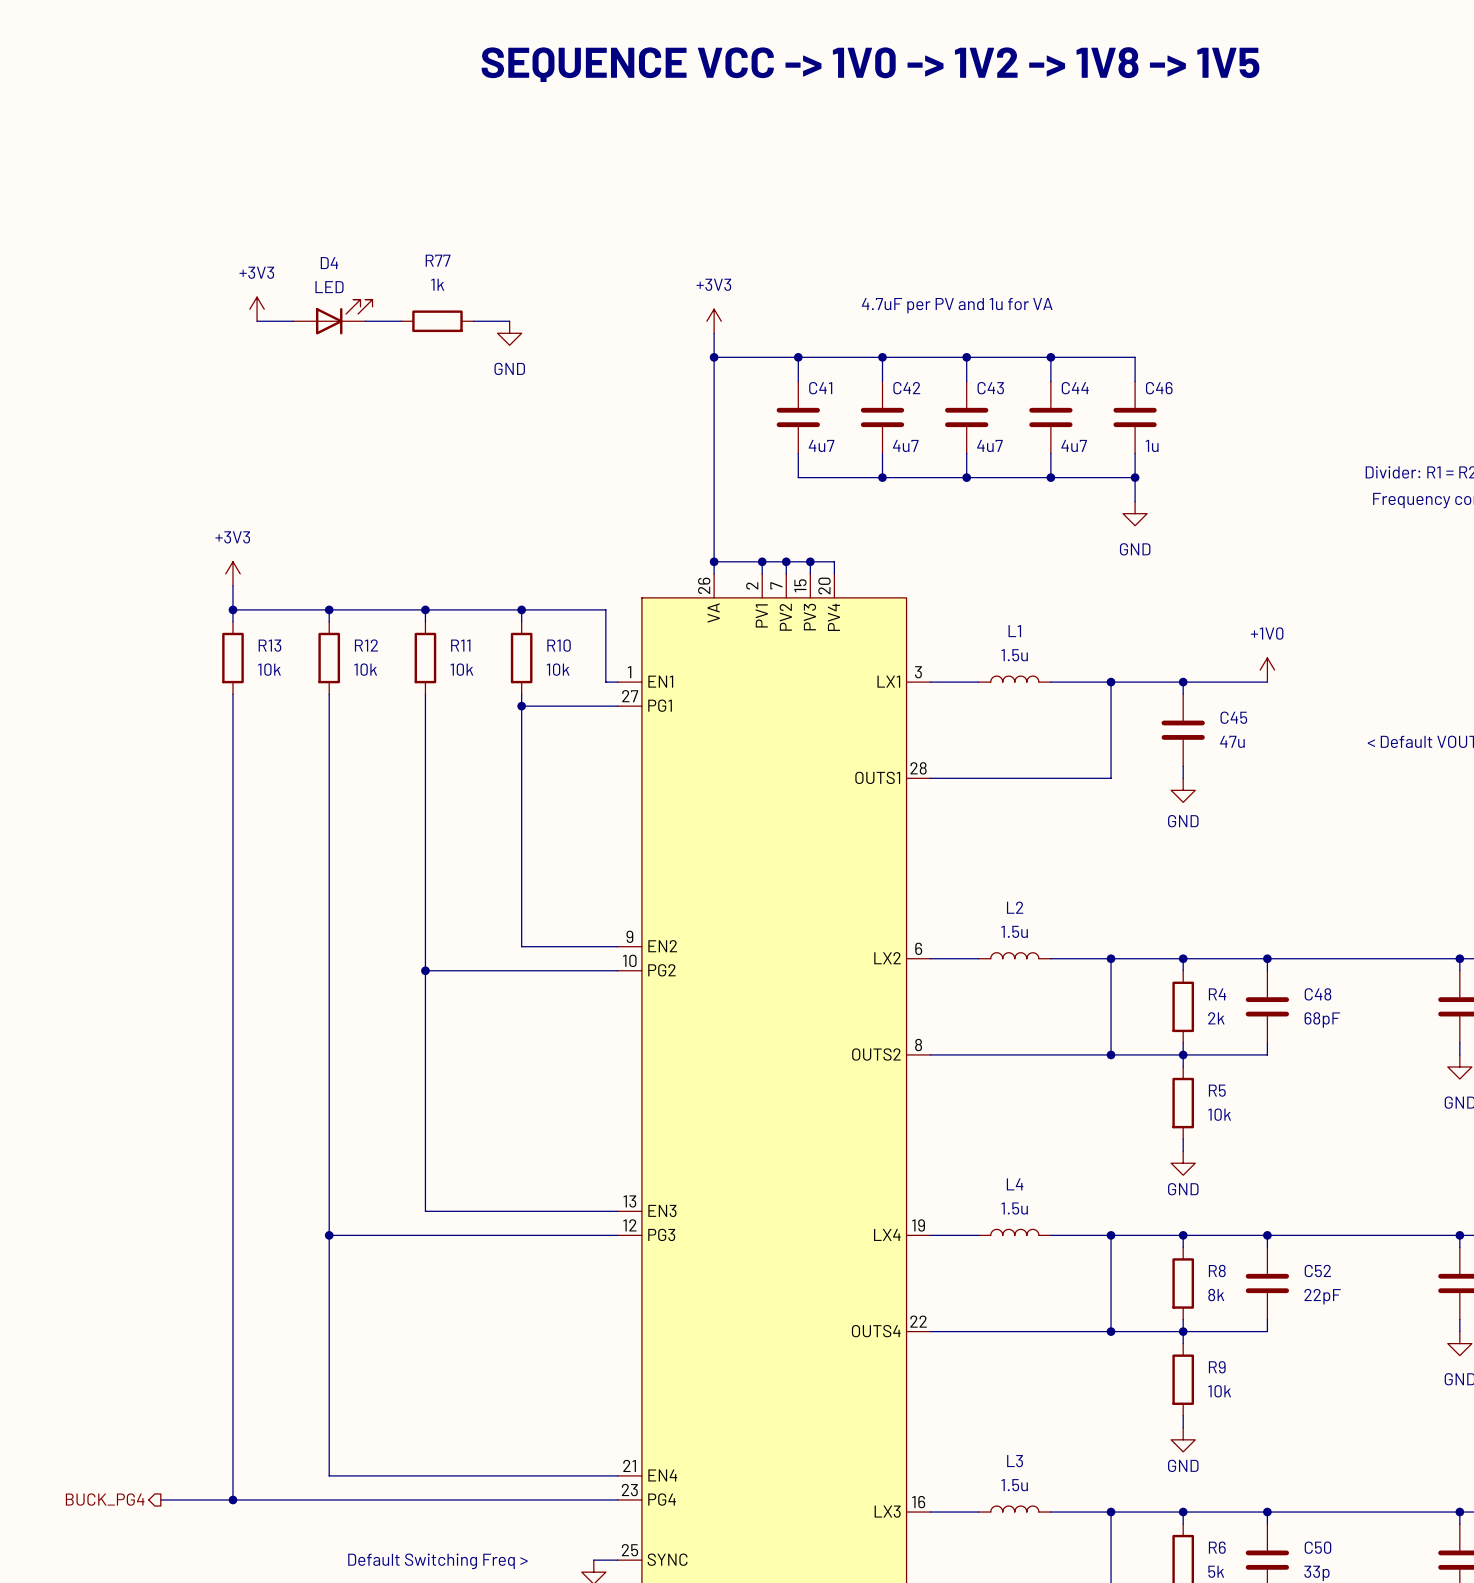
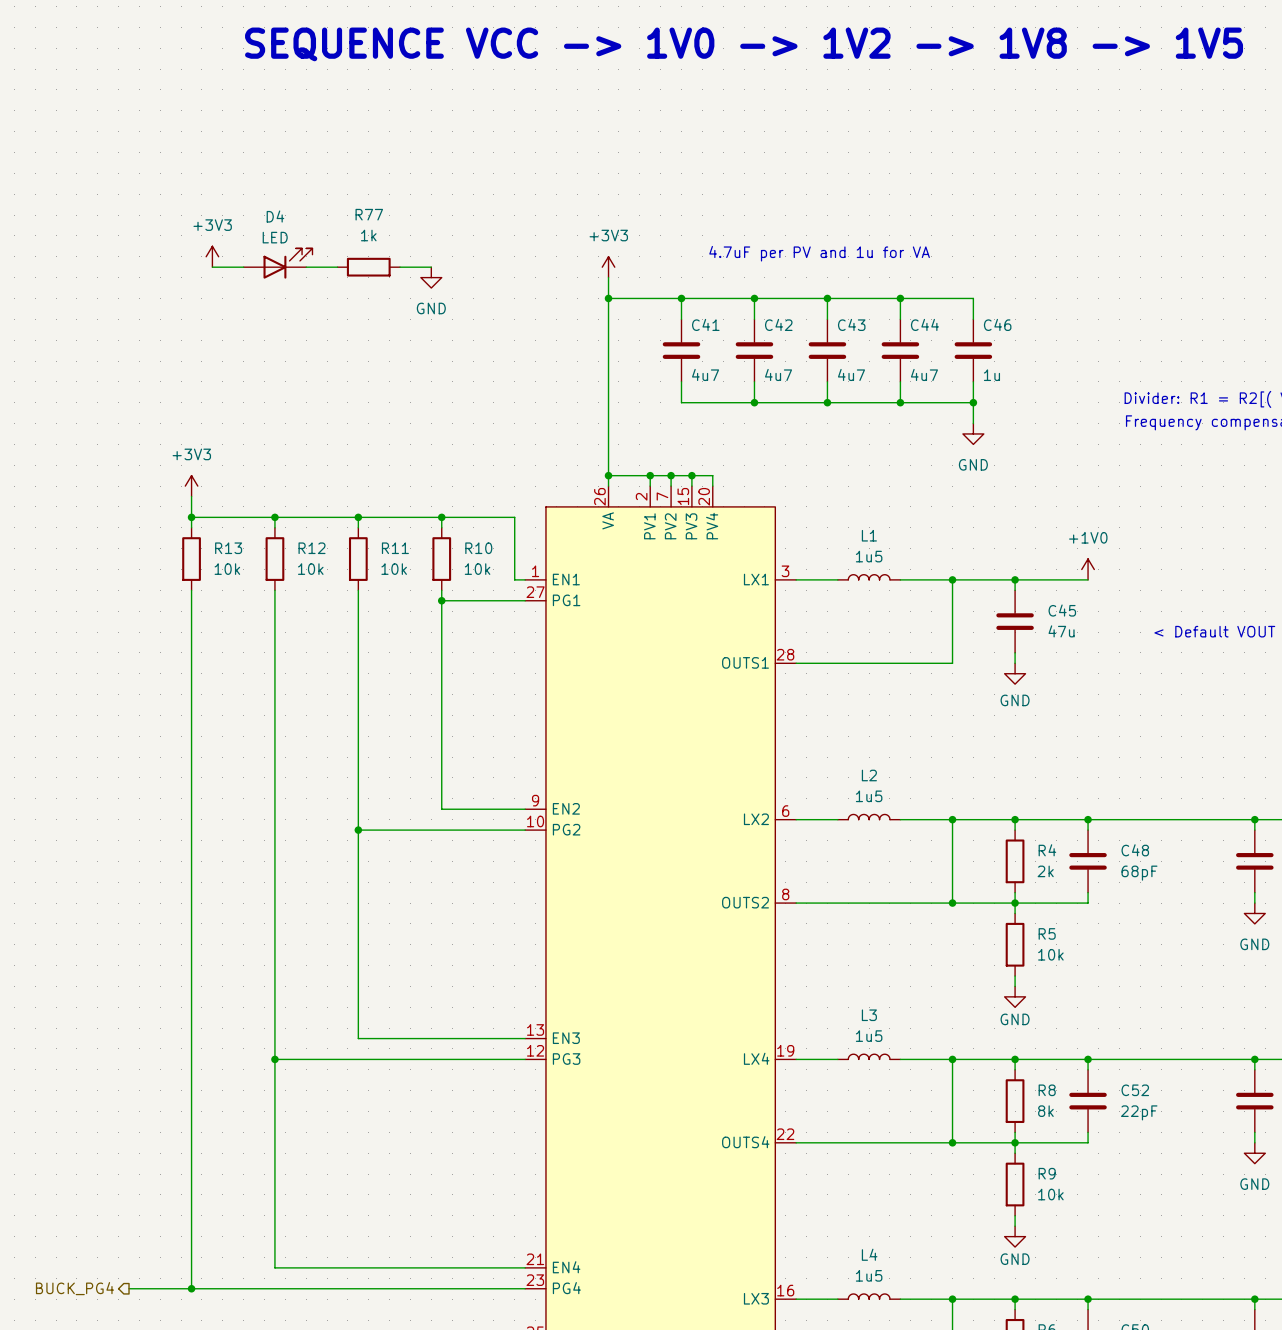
L1 value: 1.5u (1014, 655) -> 1u5 (869, 556)
L2 value: 1.5u (1014, 931) -> 1u5 (869, 796)
L4 name: L4 (1015, 1184) -> L3 (869, 1015)
L4 value: 1.5u (1014, 1208) -> 1u5 (869, 1036)
L3 name: L3 (1015, 1461) -> L4 (869, 1254)
L3 value: 1.5u (1014, 1485) -> 1u5 (869, 1275)

